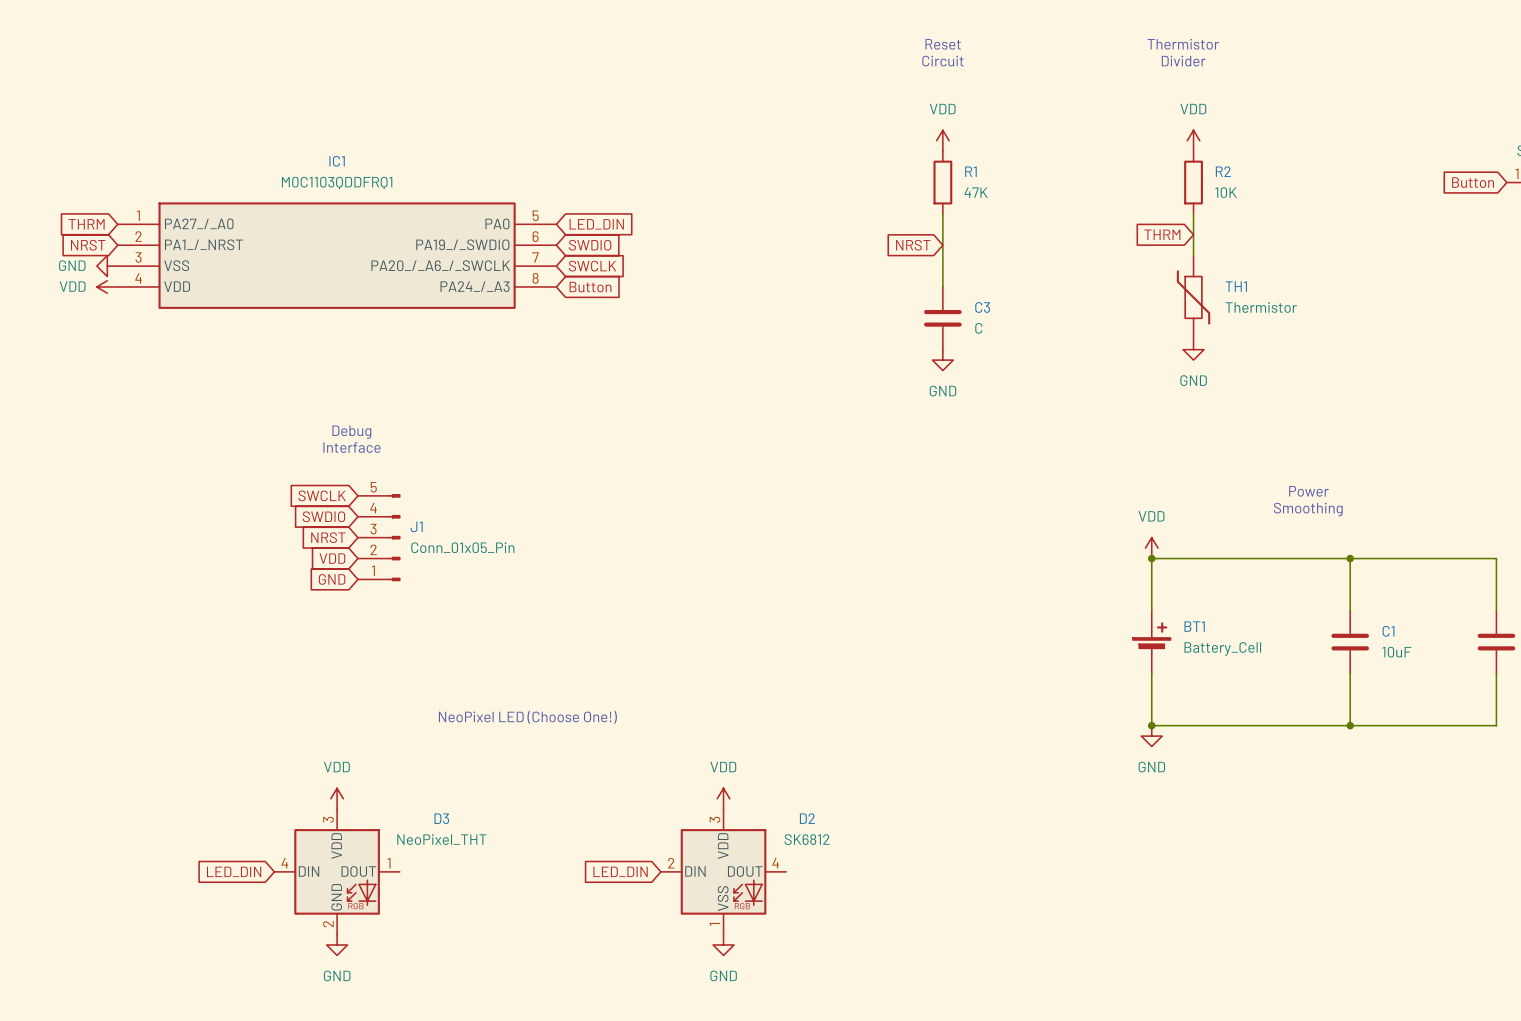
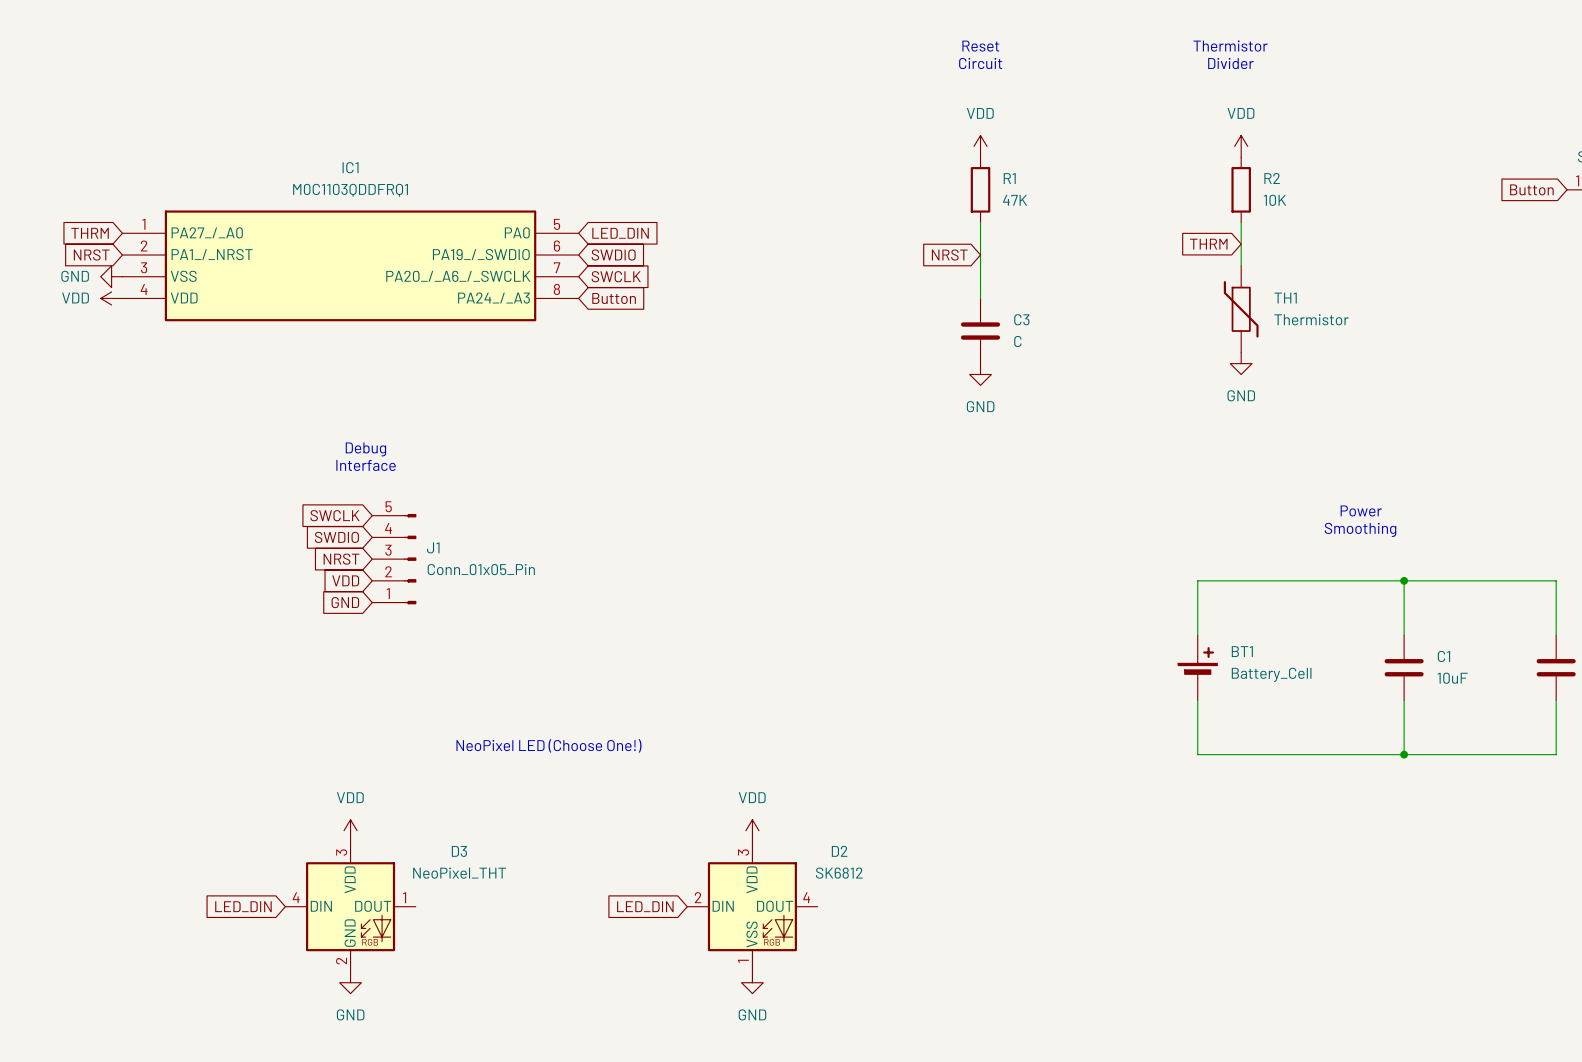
power symbol: VDD (1151, 548) -> none
junction: (1151, 558) -> none
junction: (1151, 725) -> none
power symbol: GND (1151, 736) -> none

